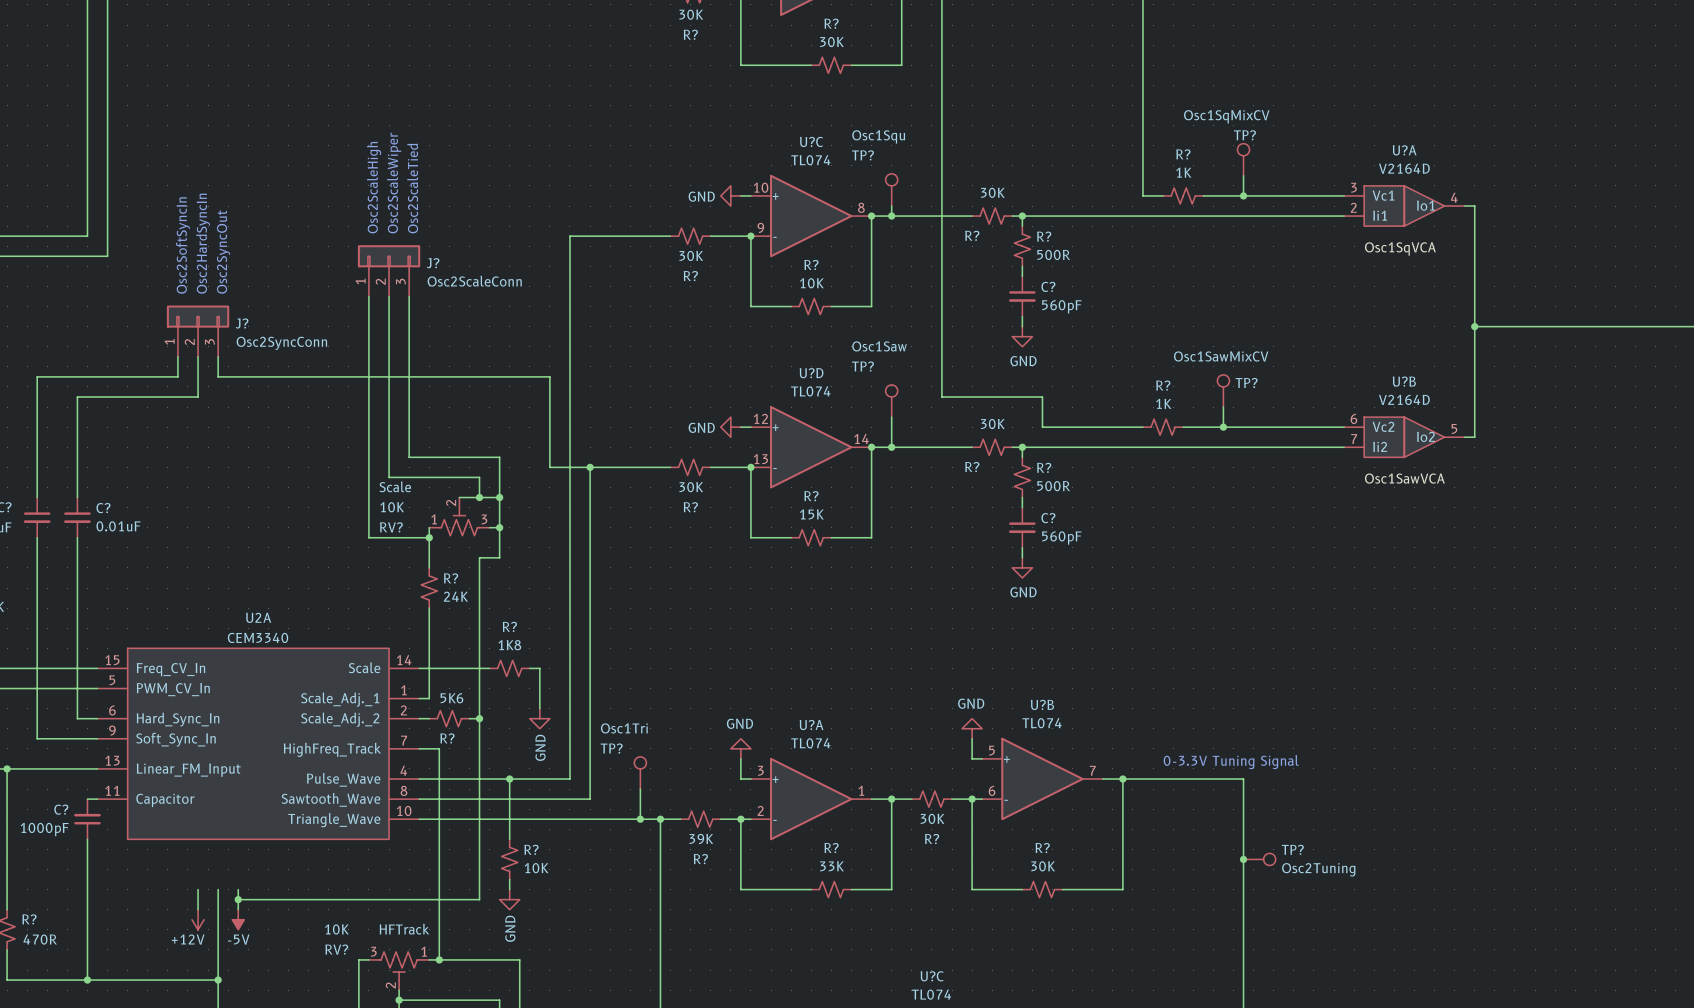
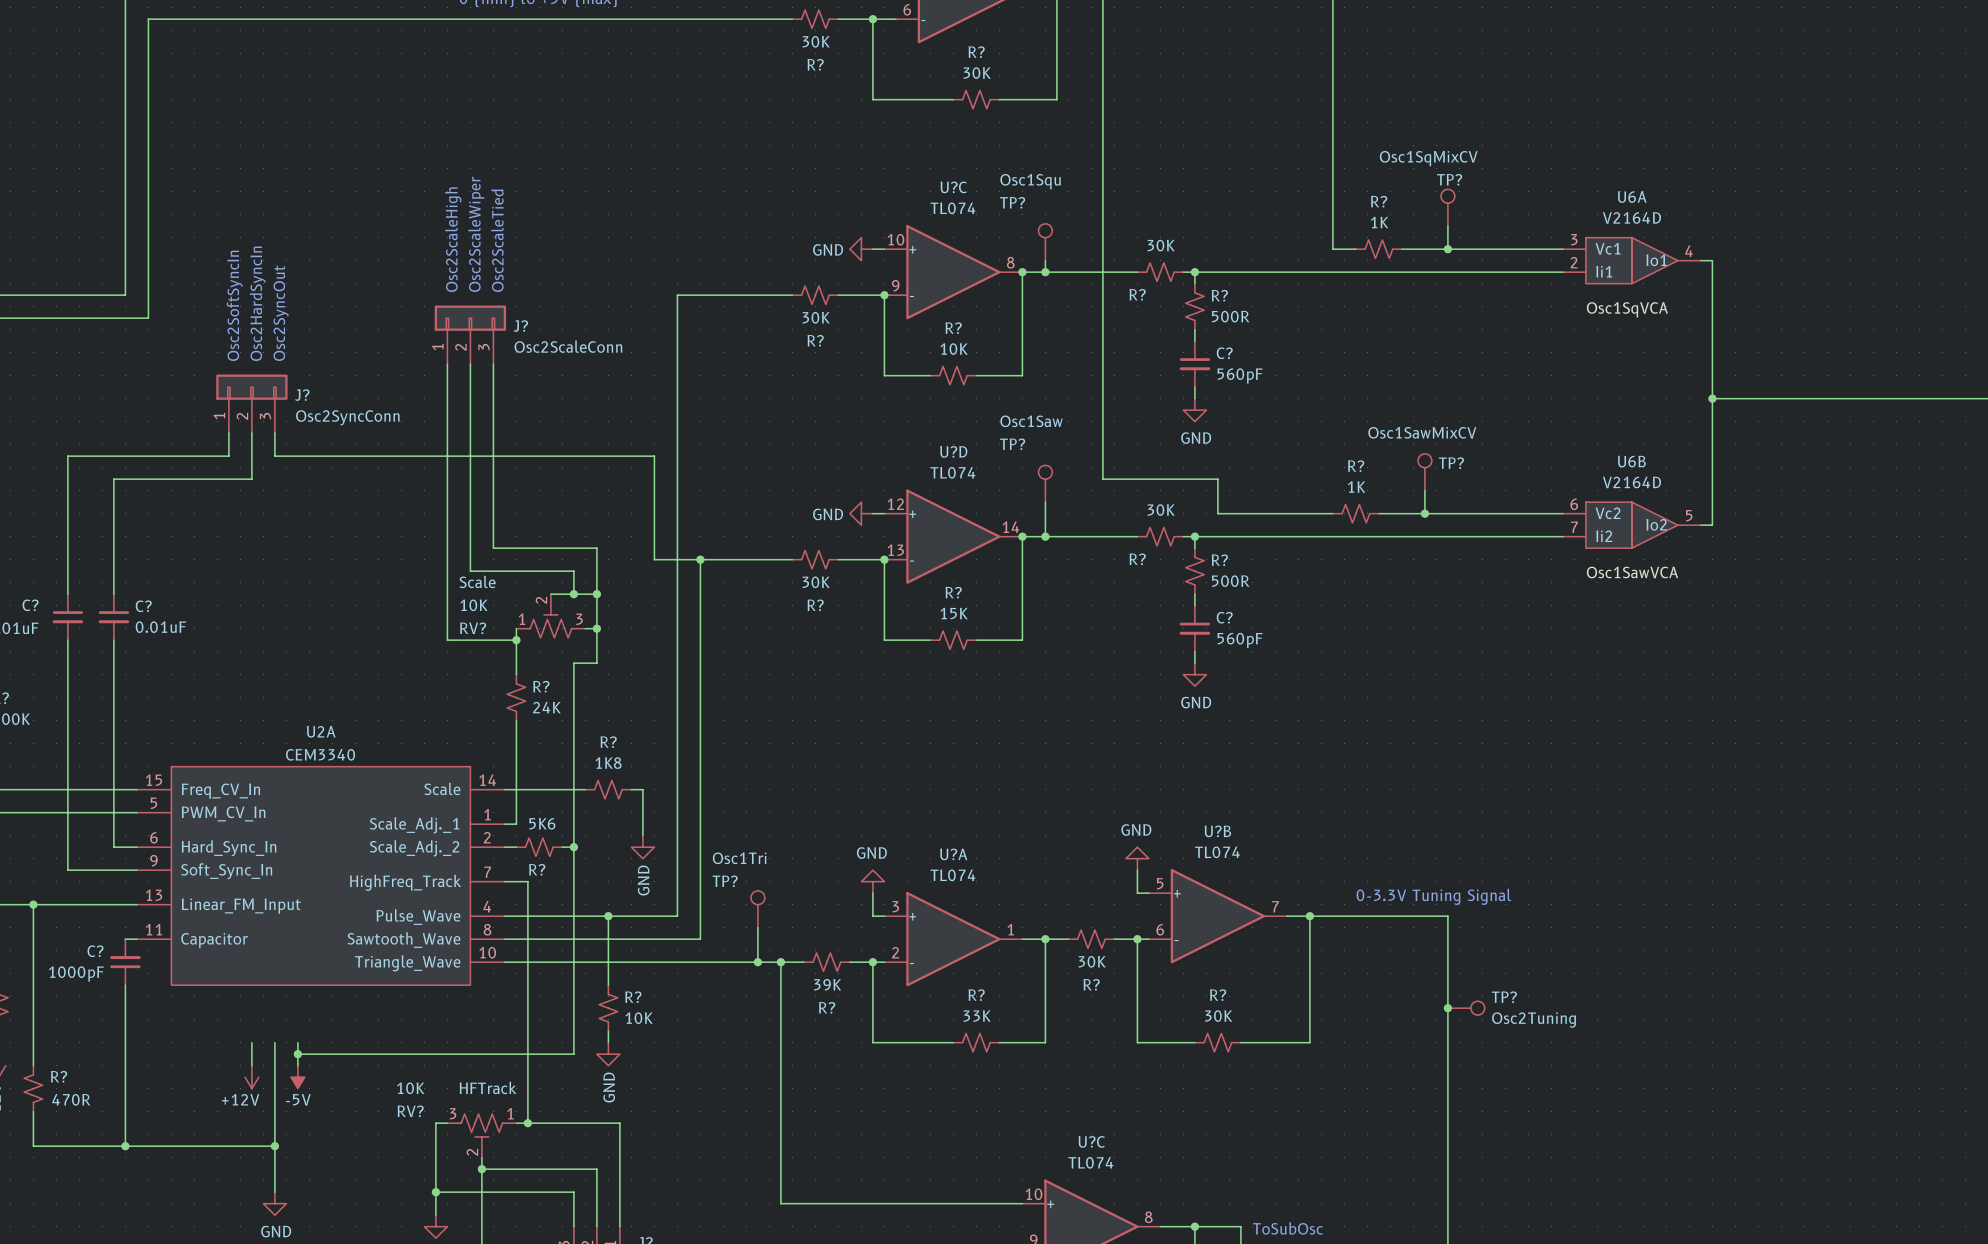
U?A name: U?A (1404, 150) -> U6A (1632, 197)
U?B name: U?B (1404, 381) -> U6B (1631, 461)

